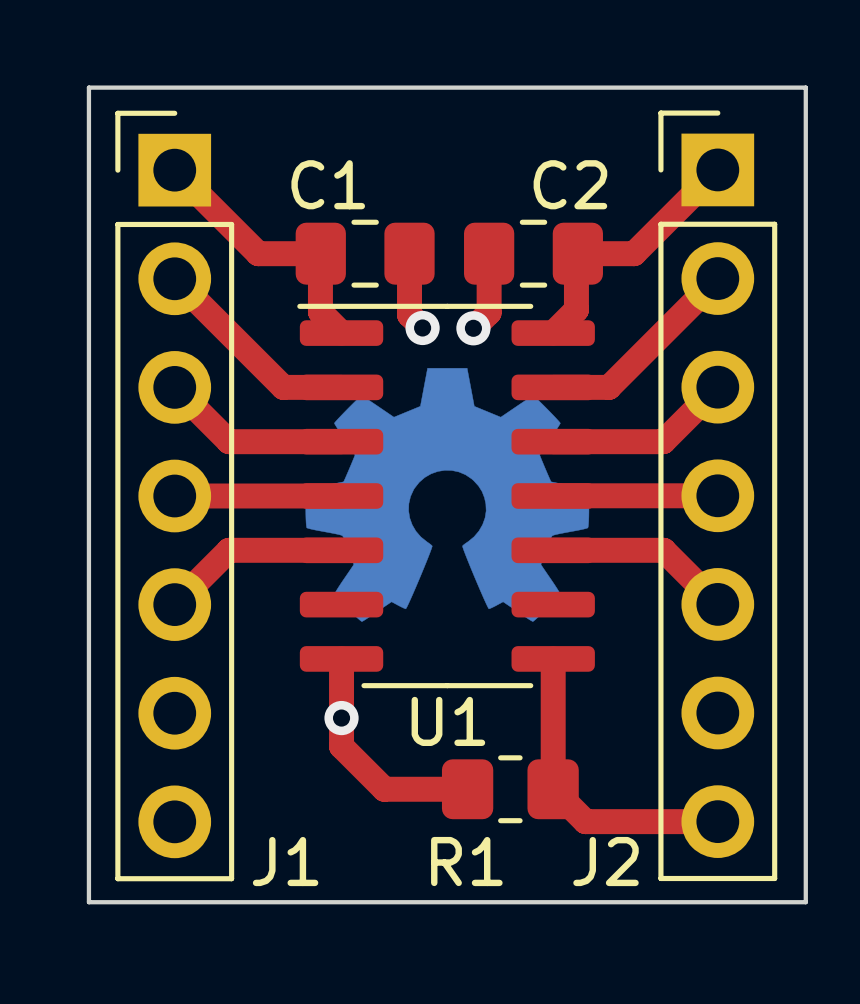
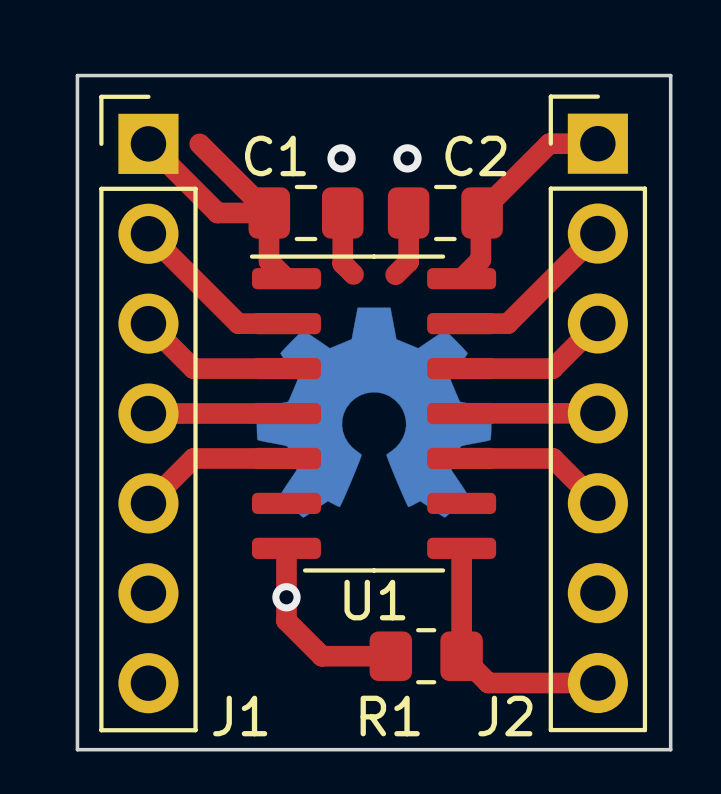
top track: (717, 169) (634, 253) (576, 255) -> (597, 143) (549, 143) (480, 214)
top track: none -> (199, 143) (269, 213)
via: none -> (341, 158)
via: none -> (407, 158)
via: (422, 327) -> none
via: (473, 328) -> none

